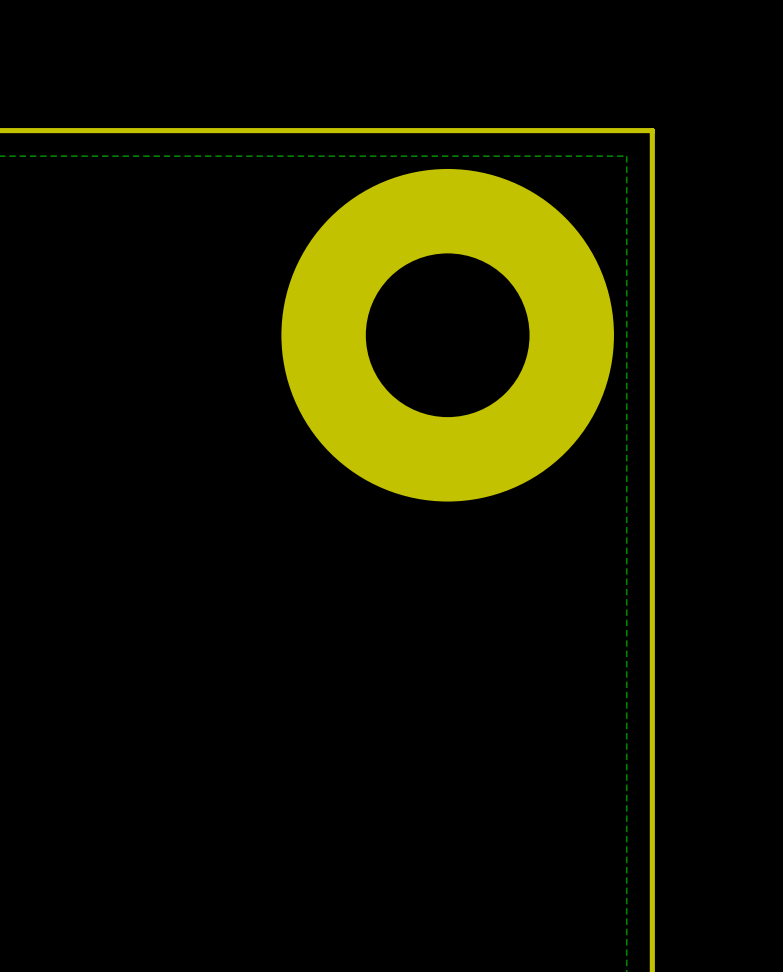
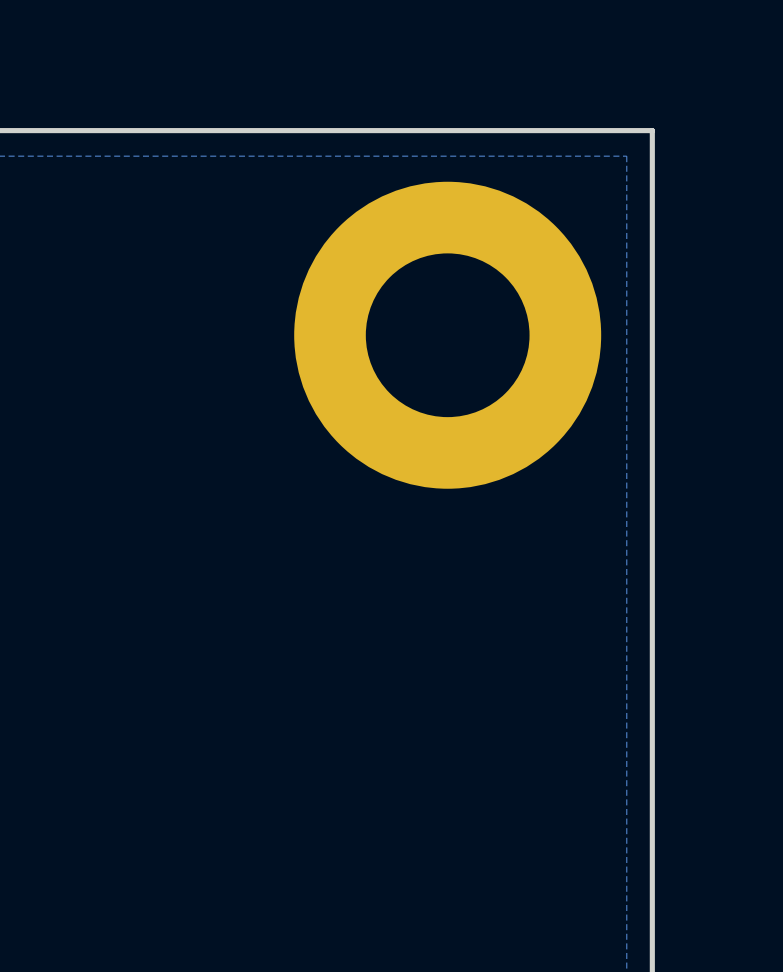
part footprint: [281, 168, 614, 502] -> [294, 181, 602, 489]

